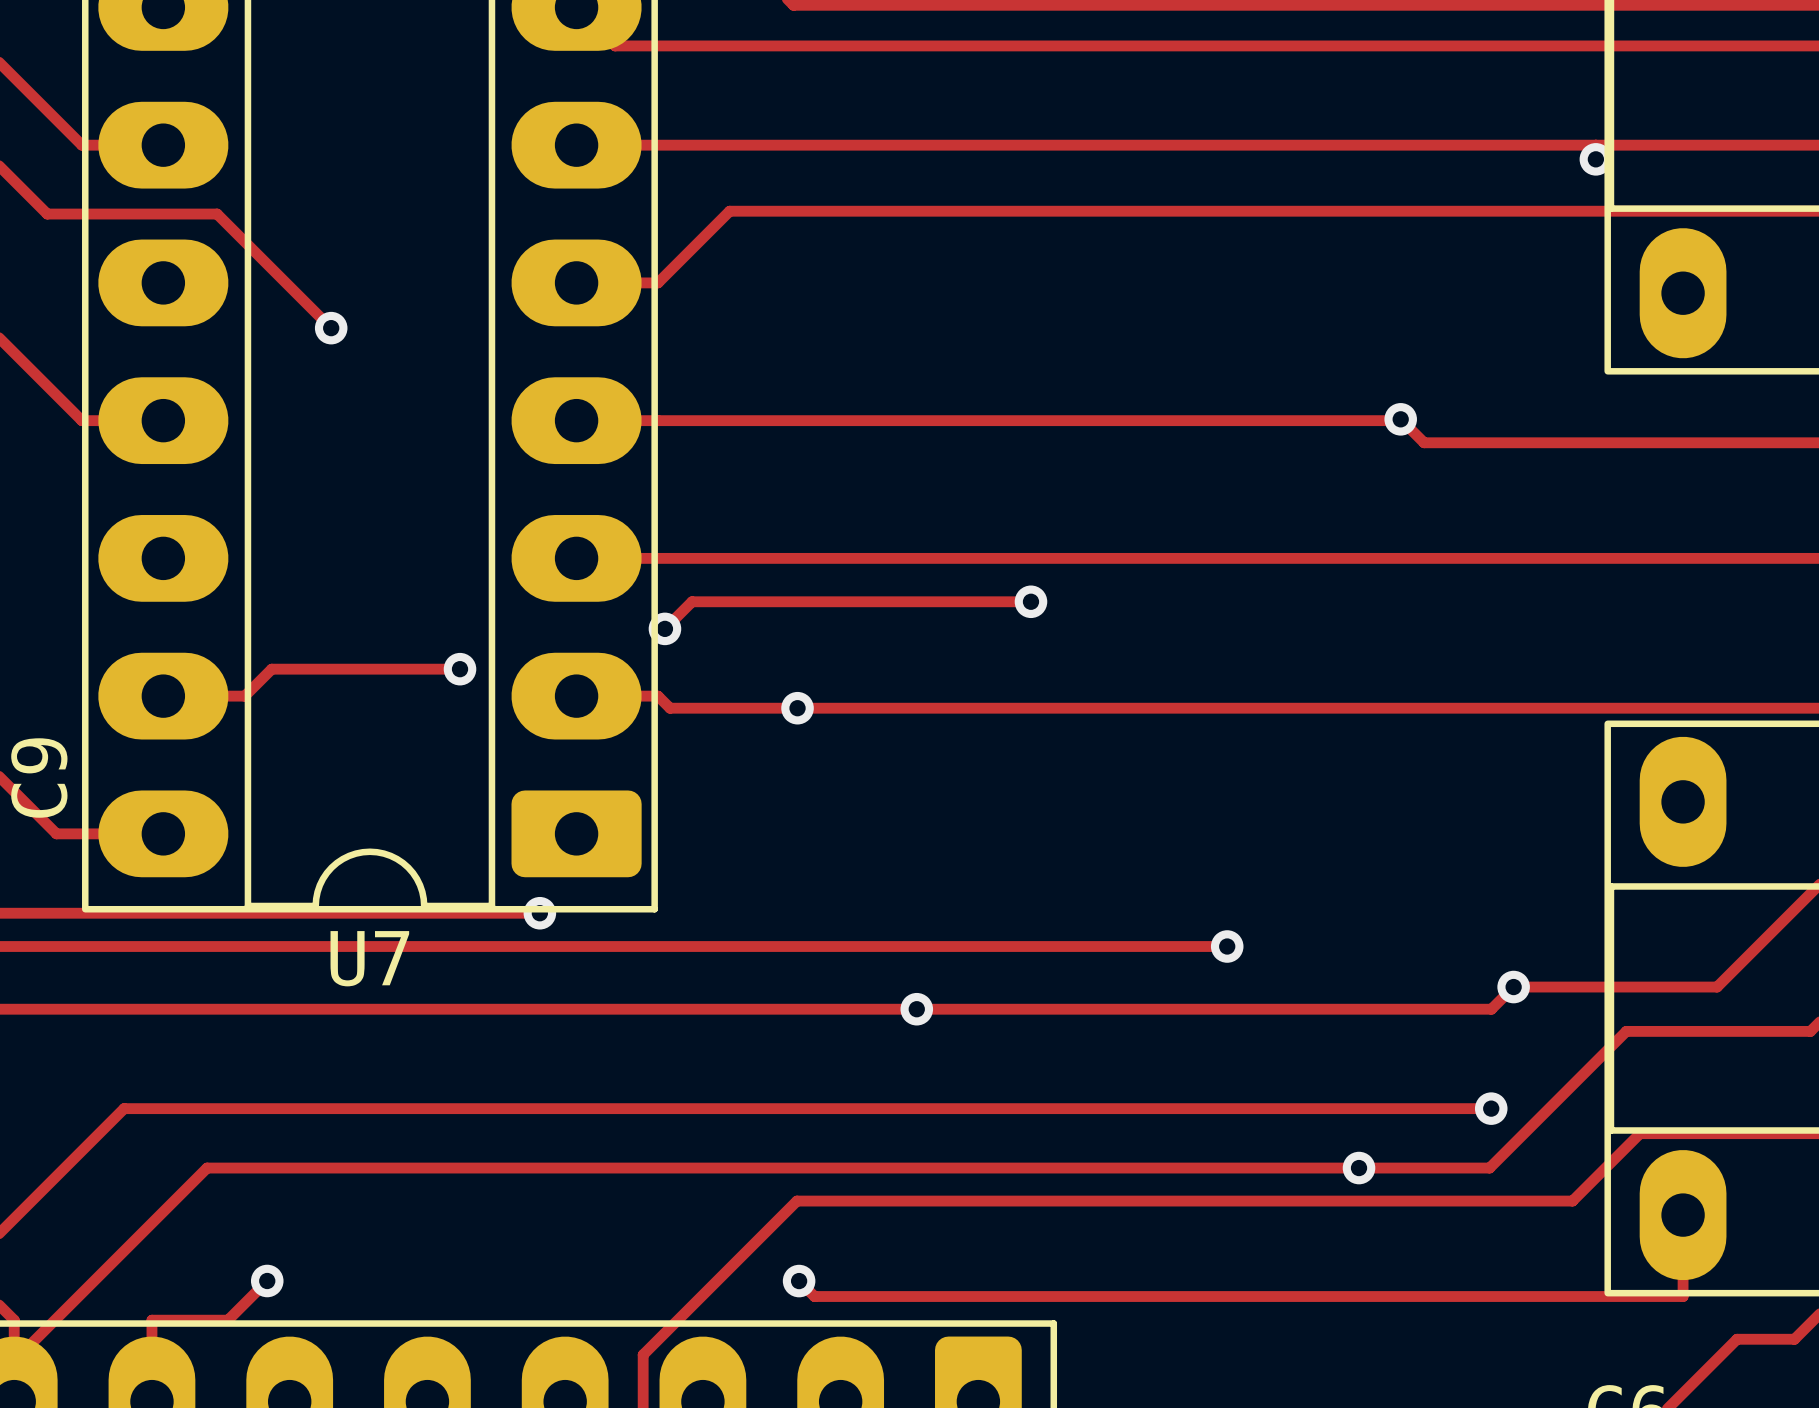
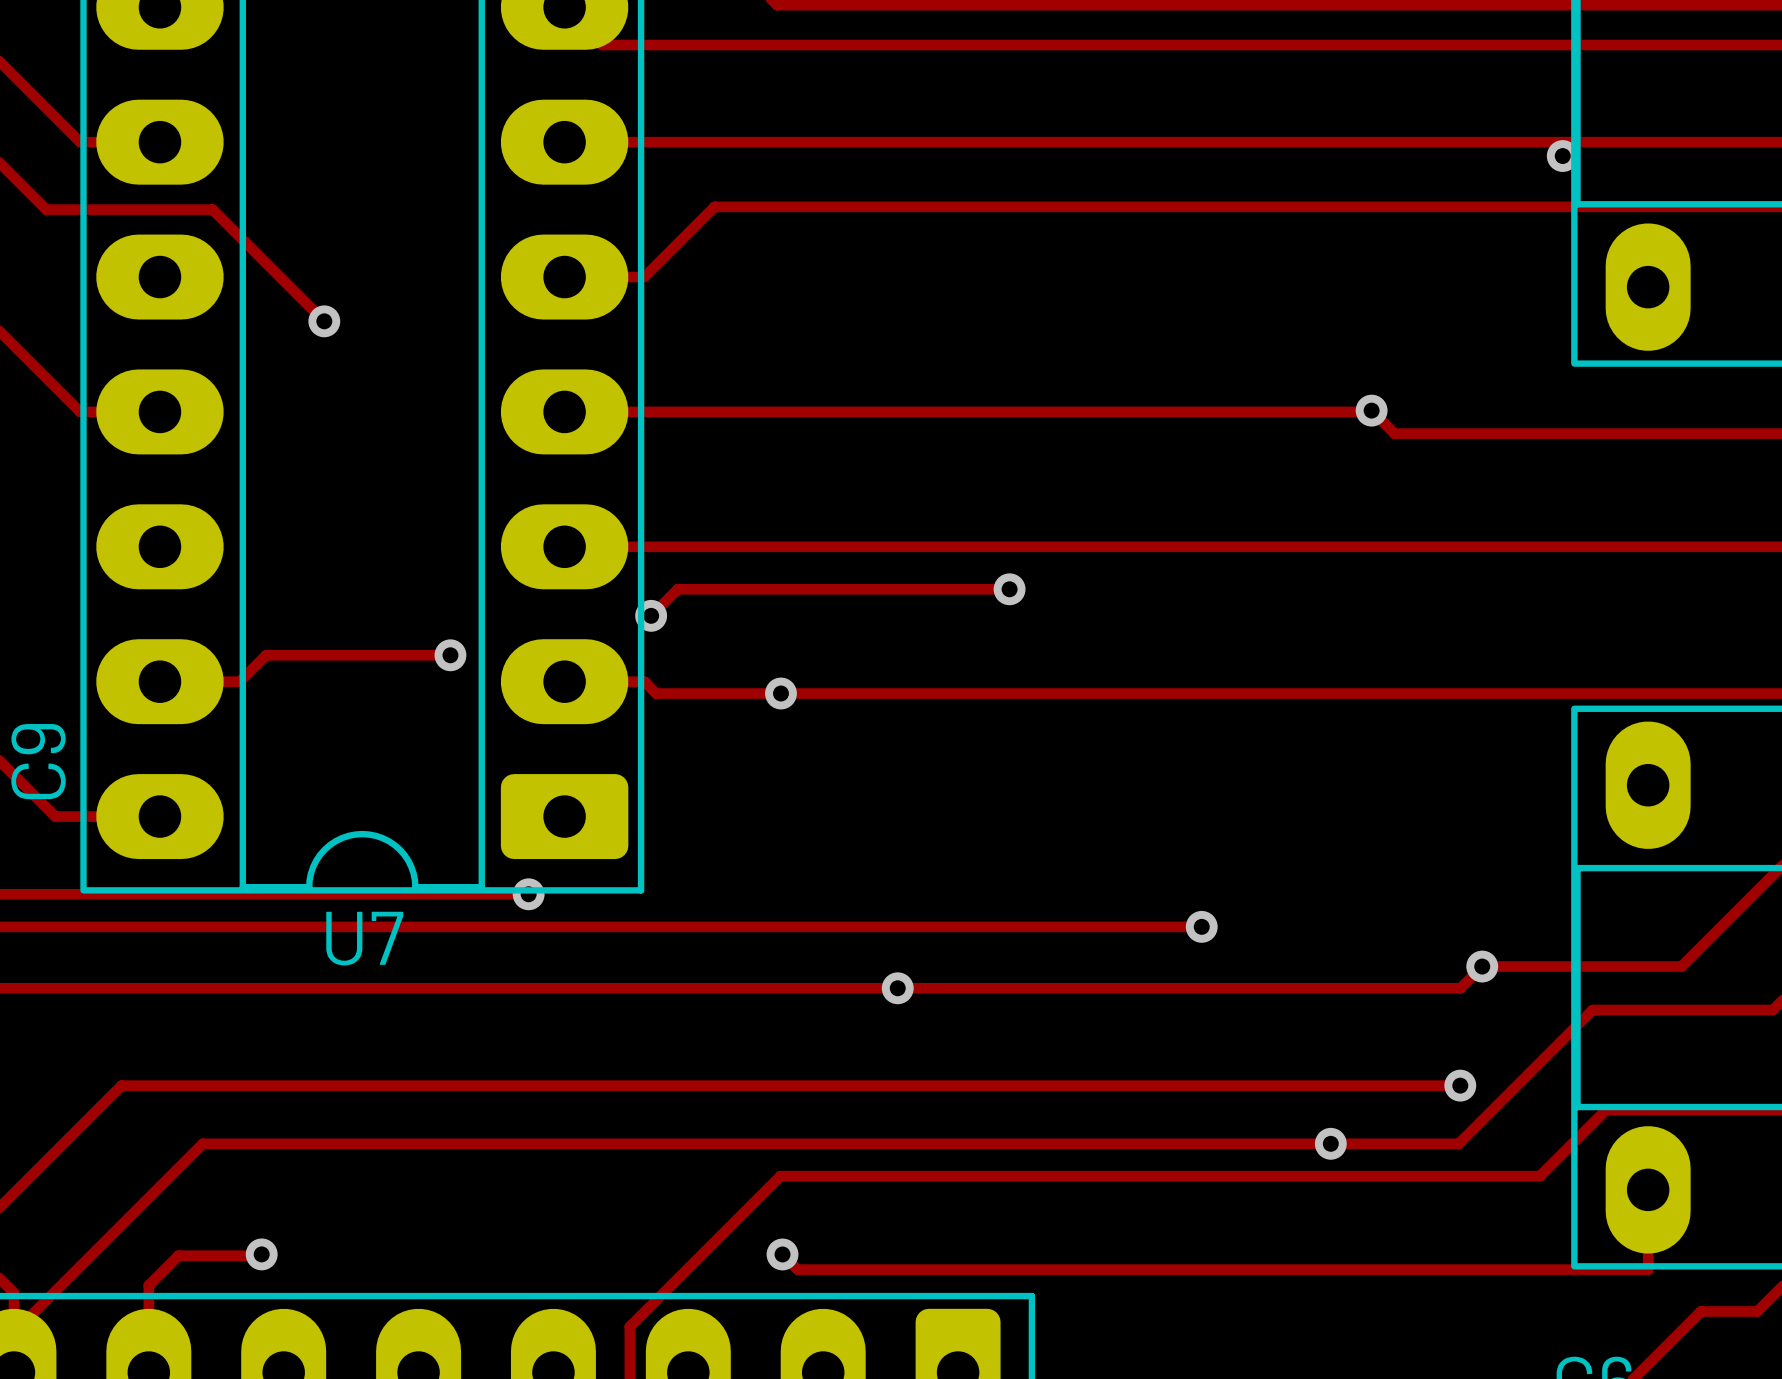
track: (265, 1282) (228, 1320) (151, 1320) -> (260, 1255) (178, 1255) (148, 1285) (148, 1292)

